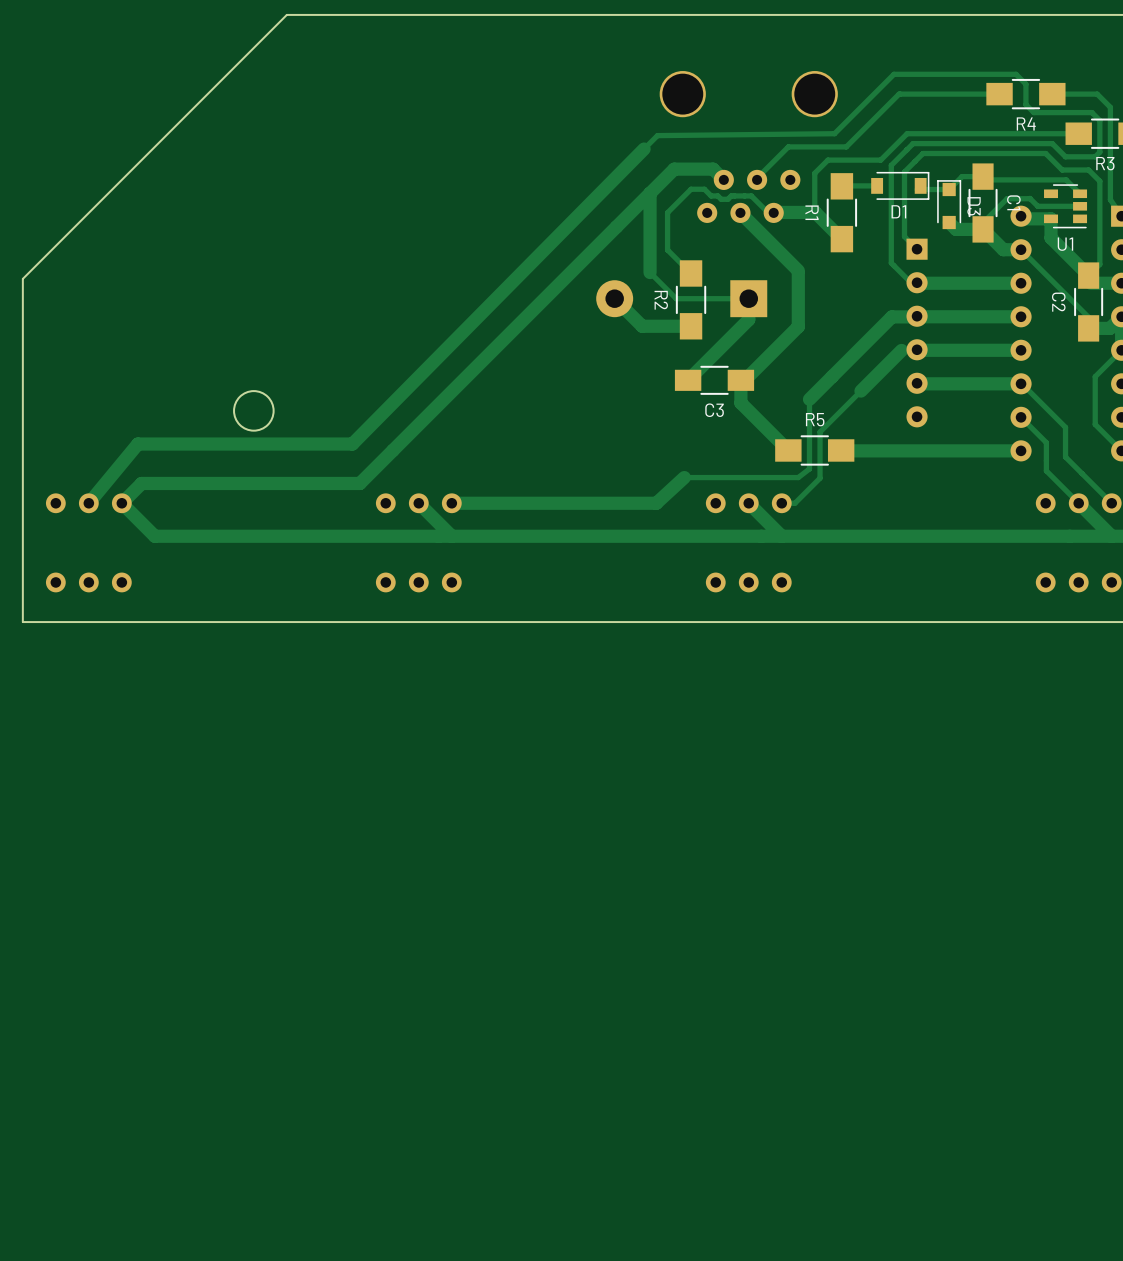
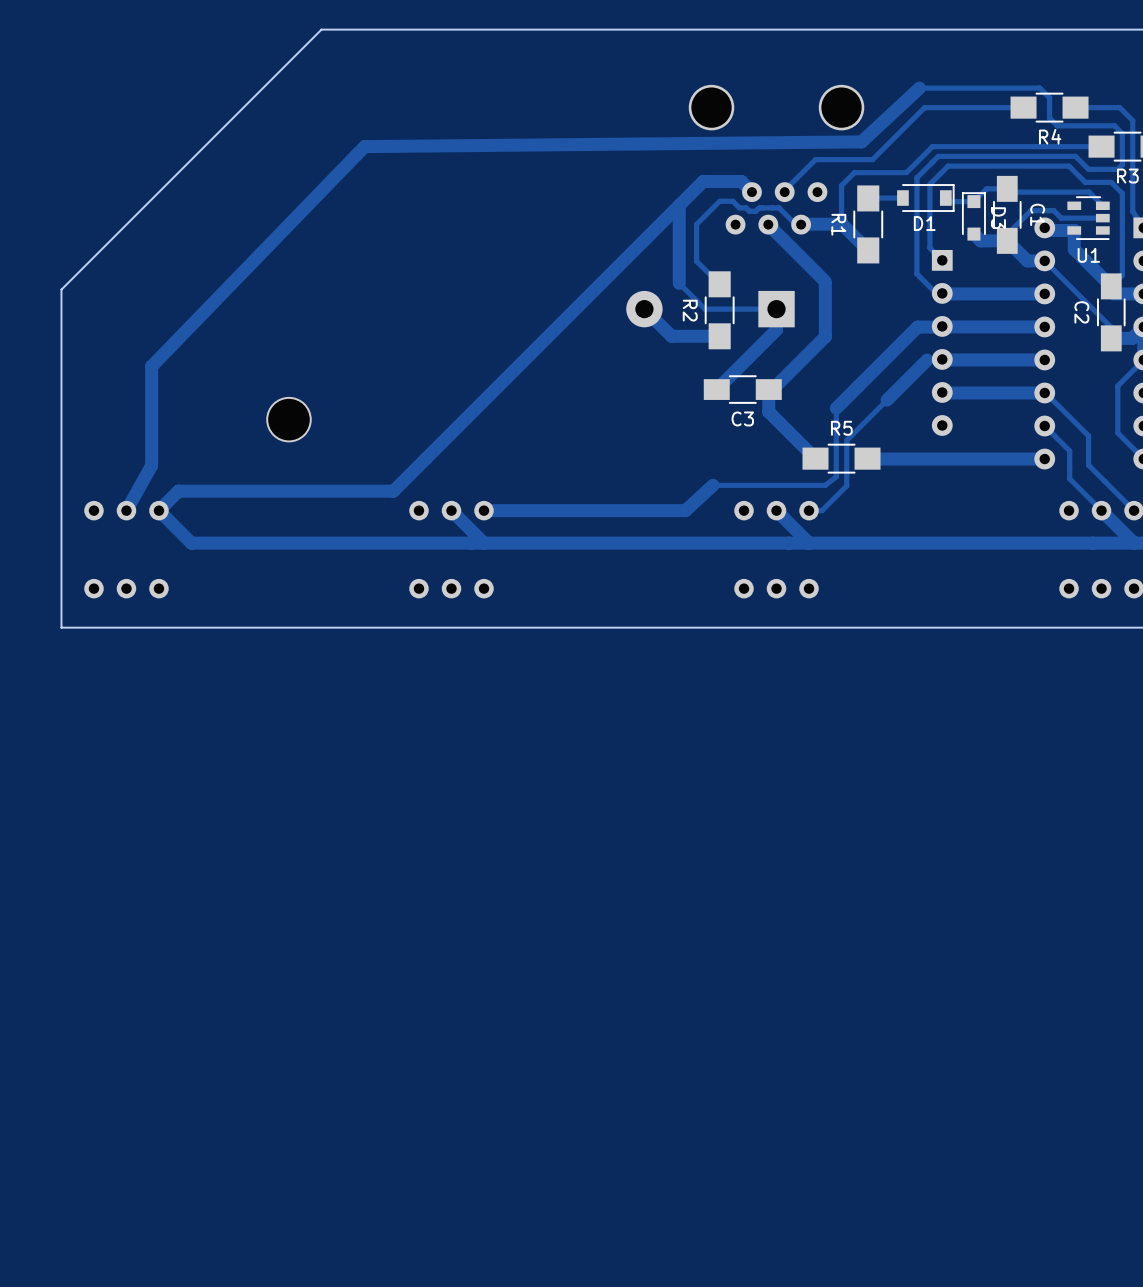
track: (893, 74) (834, 133) (657, 135) (352, 444) (137, 444) (88, 503) -> (919, 88) (861, 141) (364, 146) (151, 366) (151, 465) (126, 510)
round board edge: [233, 390, 275, 432] -> none
part: none -> (288, 419)

